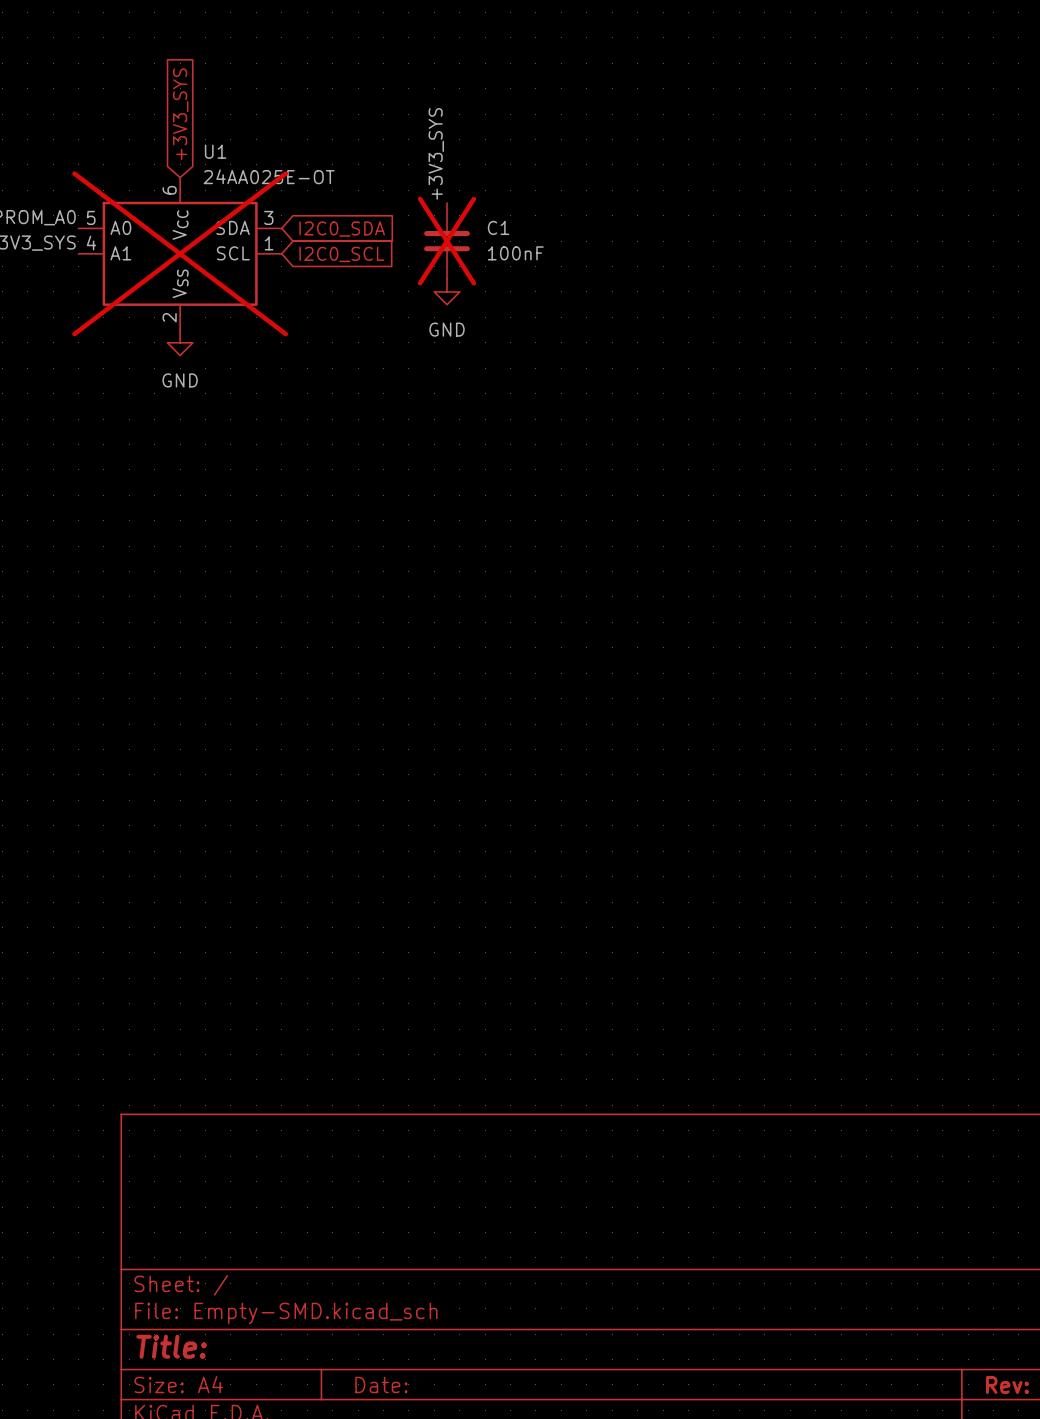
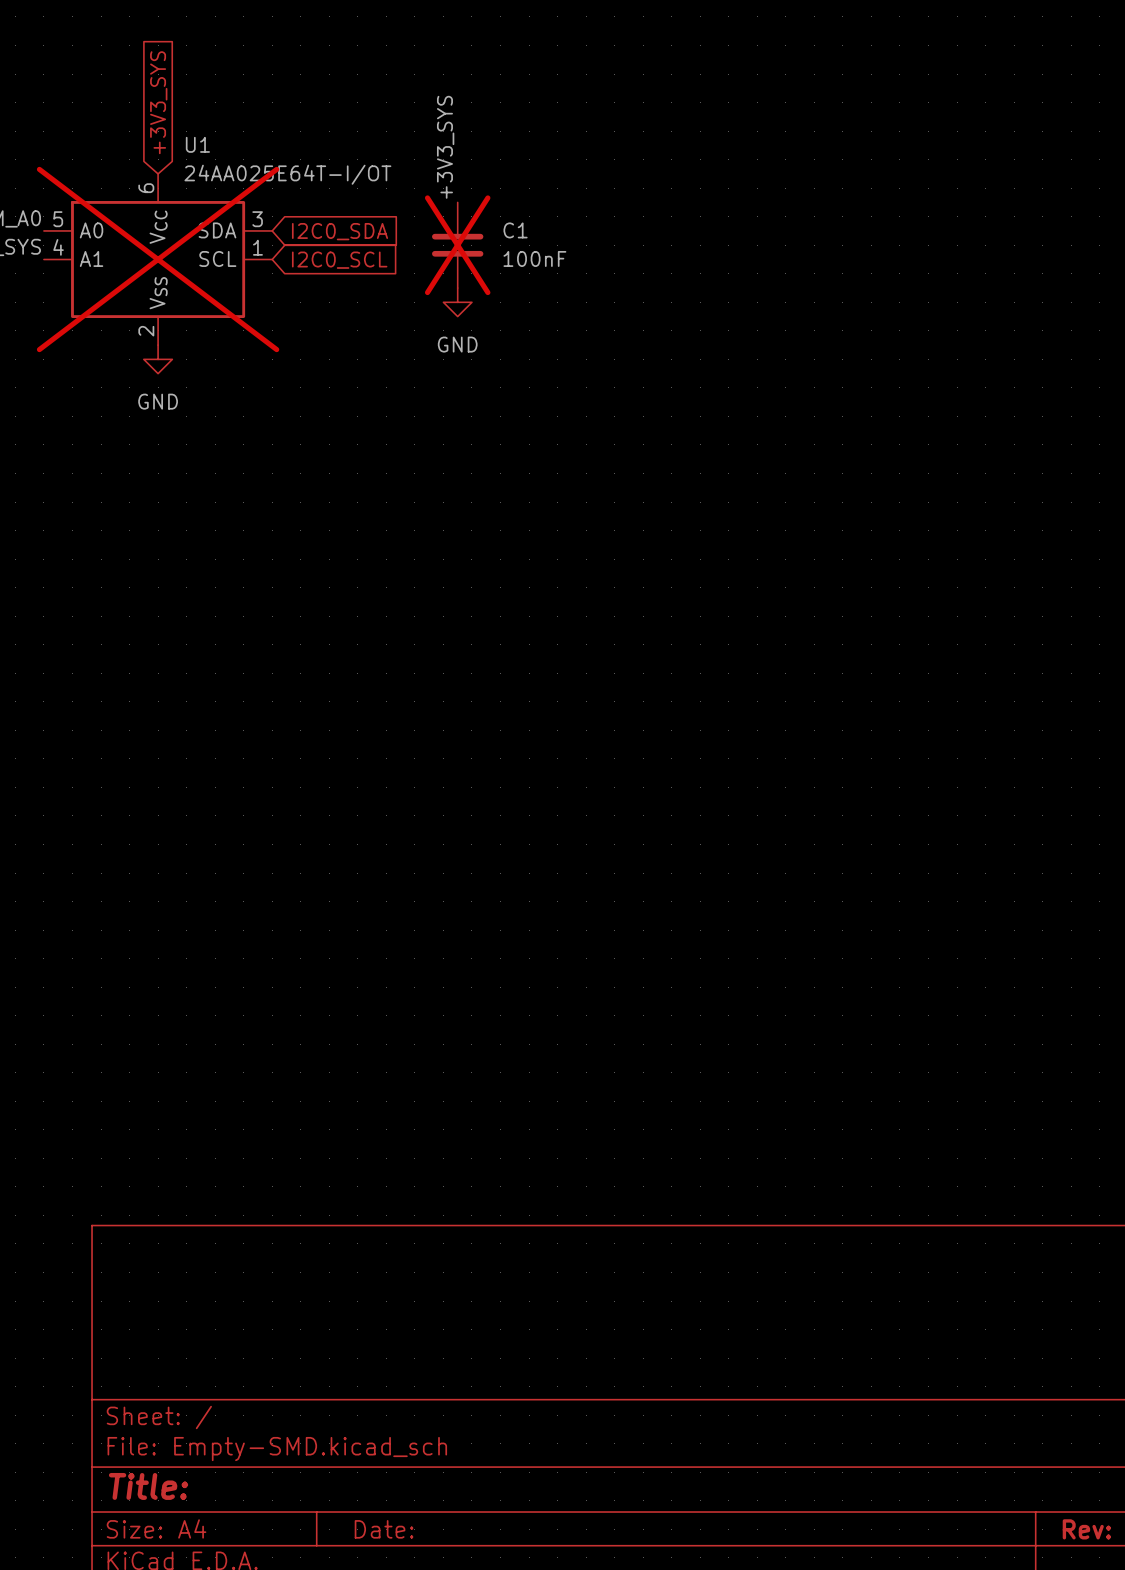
U1 value: 24AA025E-OT (269, 176) -> 24AA025E64T-I/OT (287, 174)

